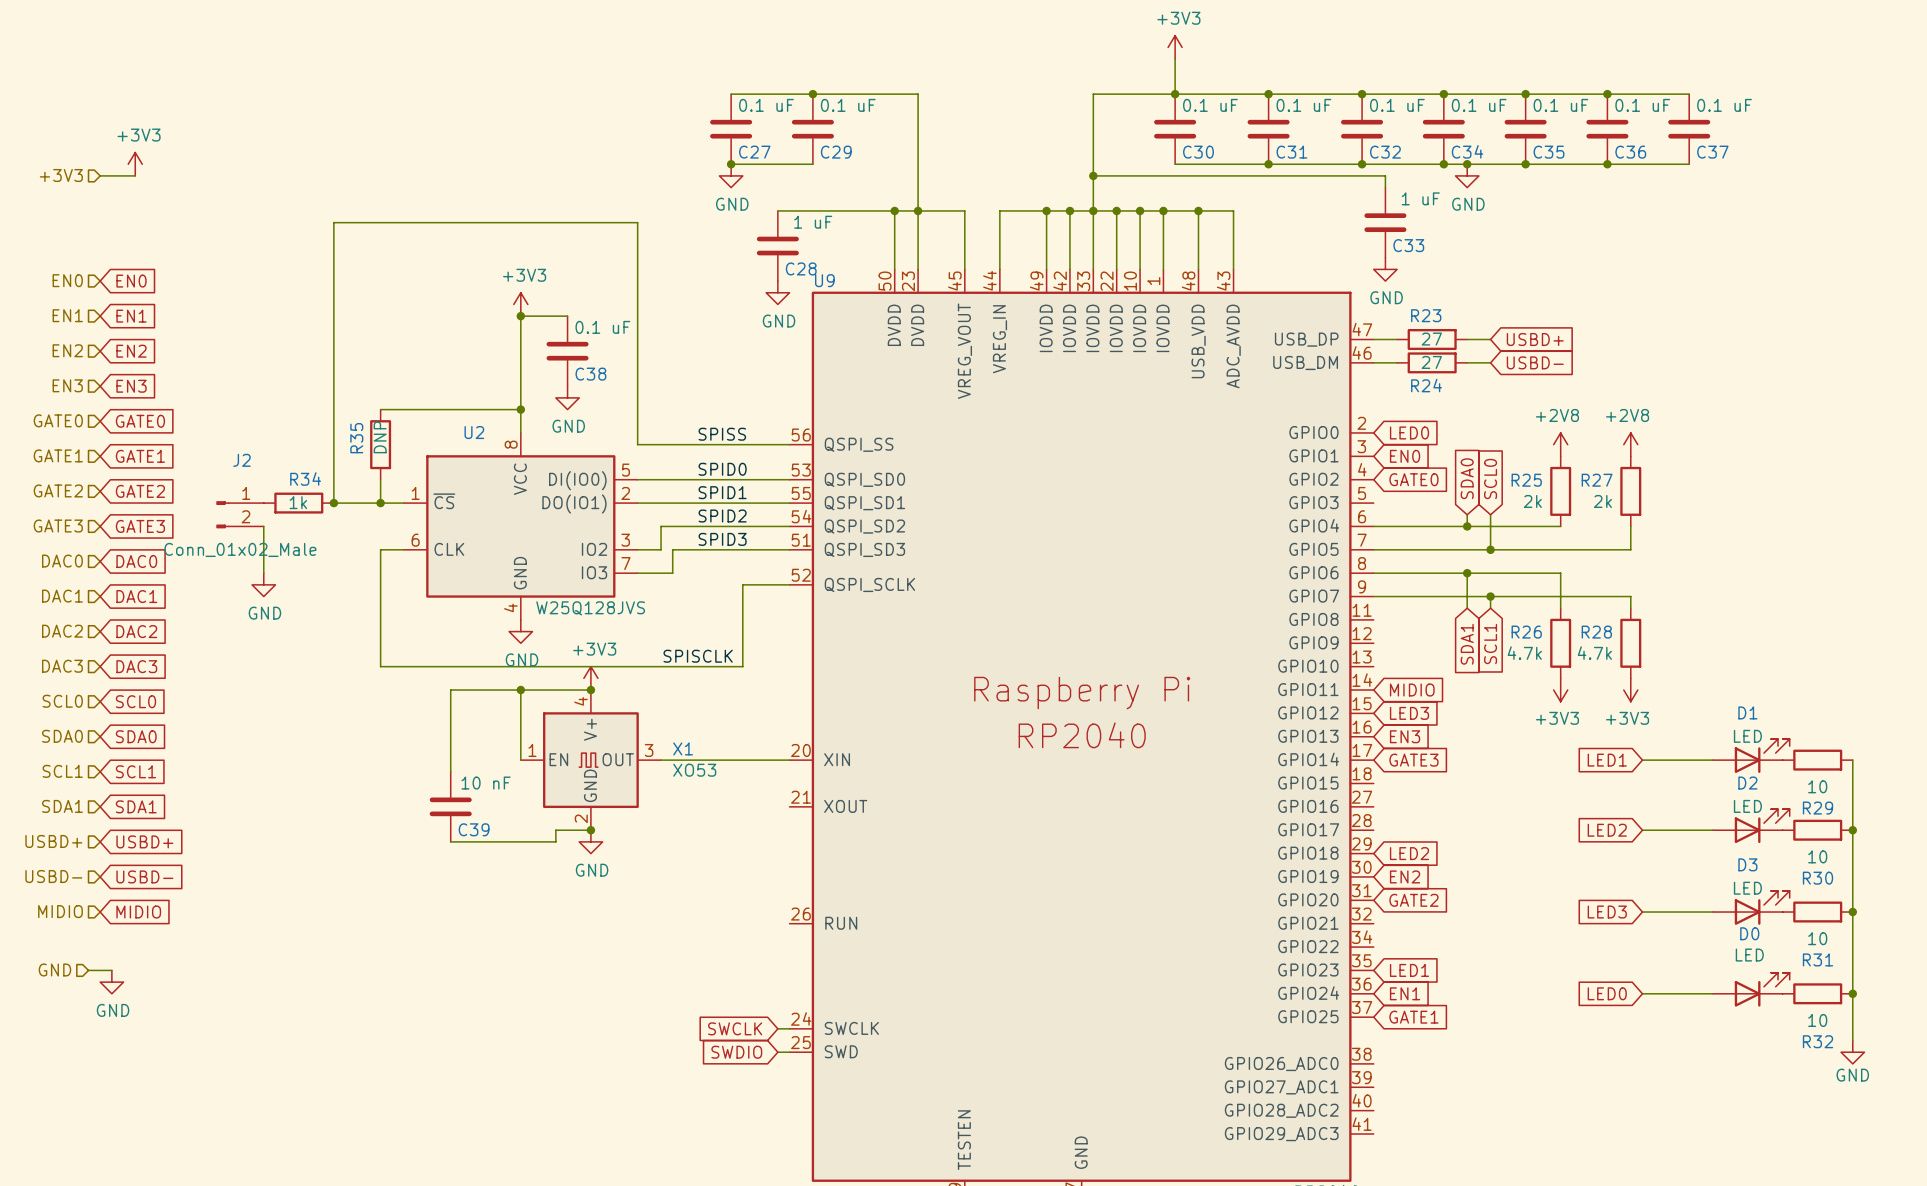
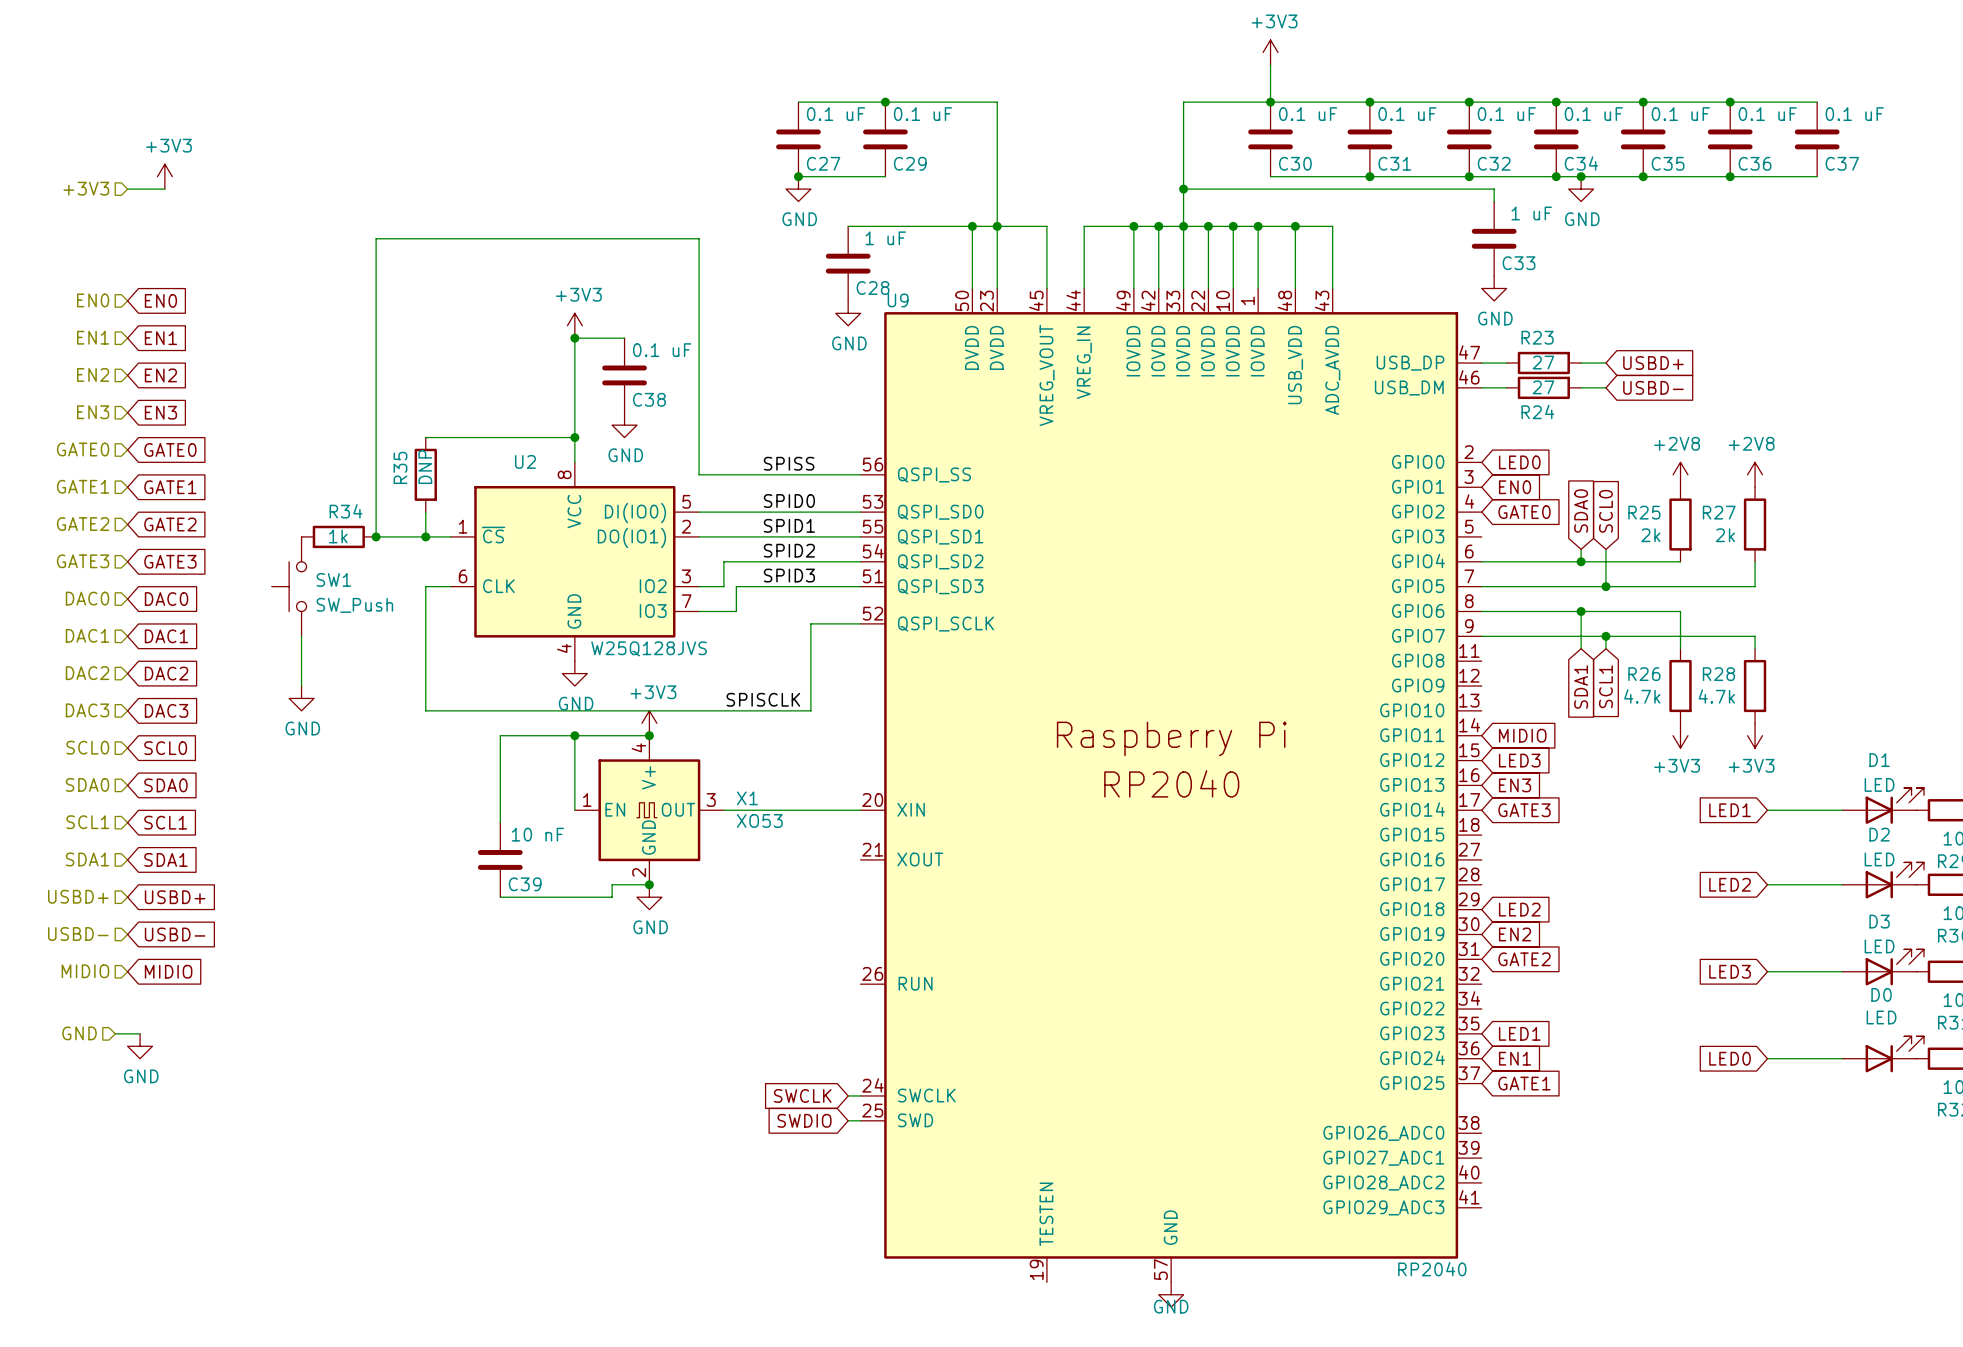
J2: Conn_01x02_Male (240, 514) -> none
wire: (263, 526) (263, 573) -> (301, 636) (301, 686)
SW1: none -> SW_Push (289, 586)
power symbol position: GND (263, 584) -> GND (301, 698)

